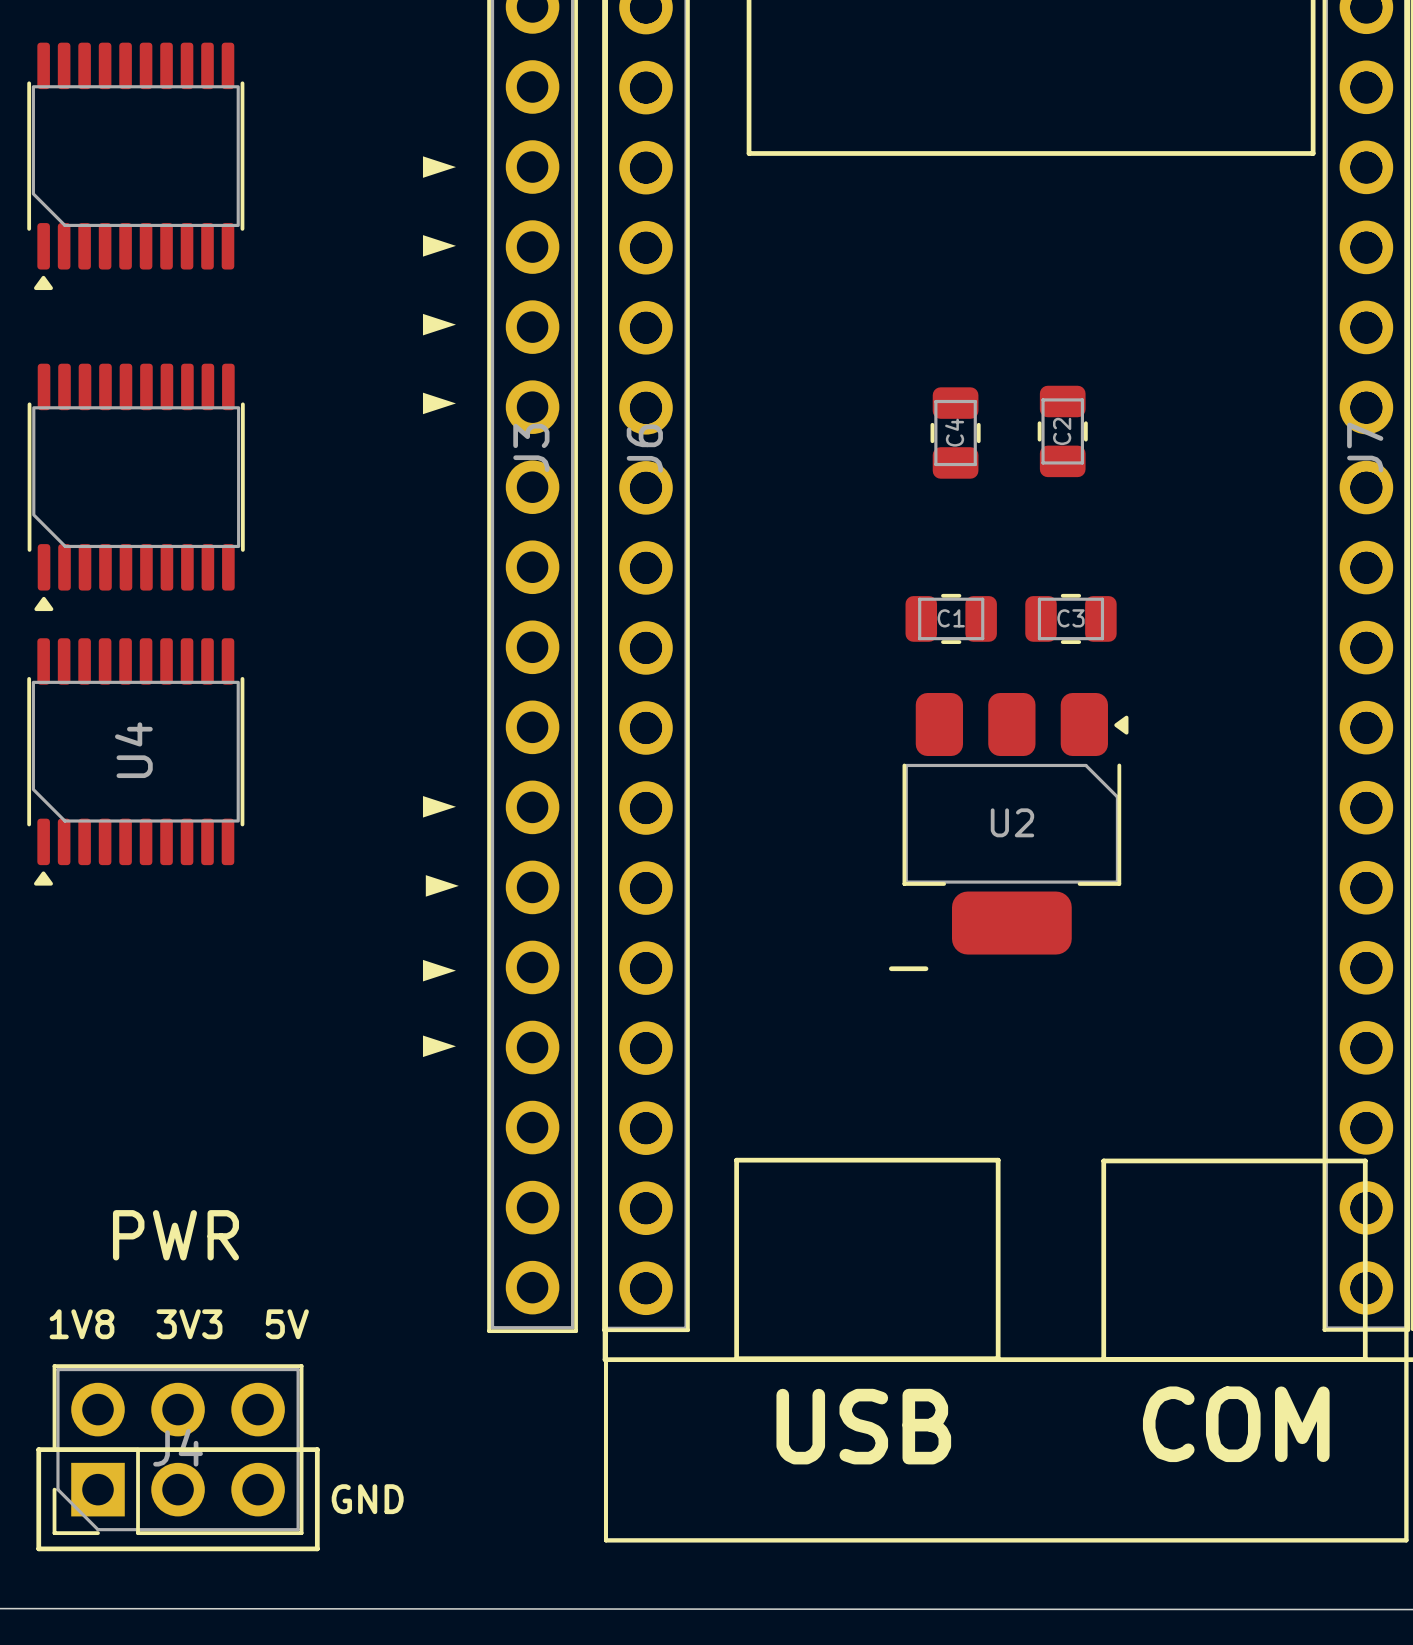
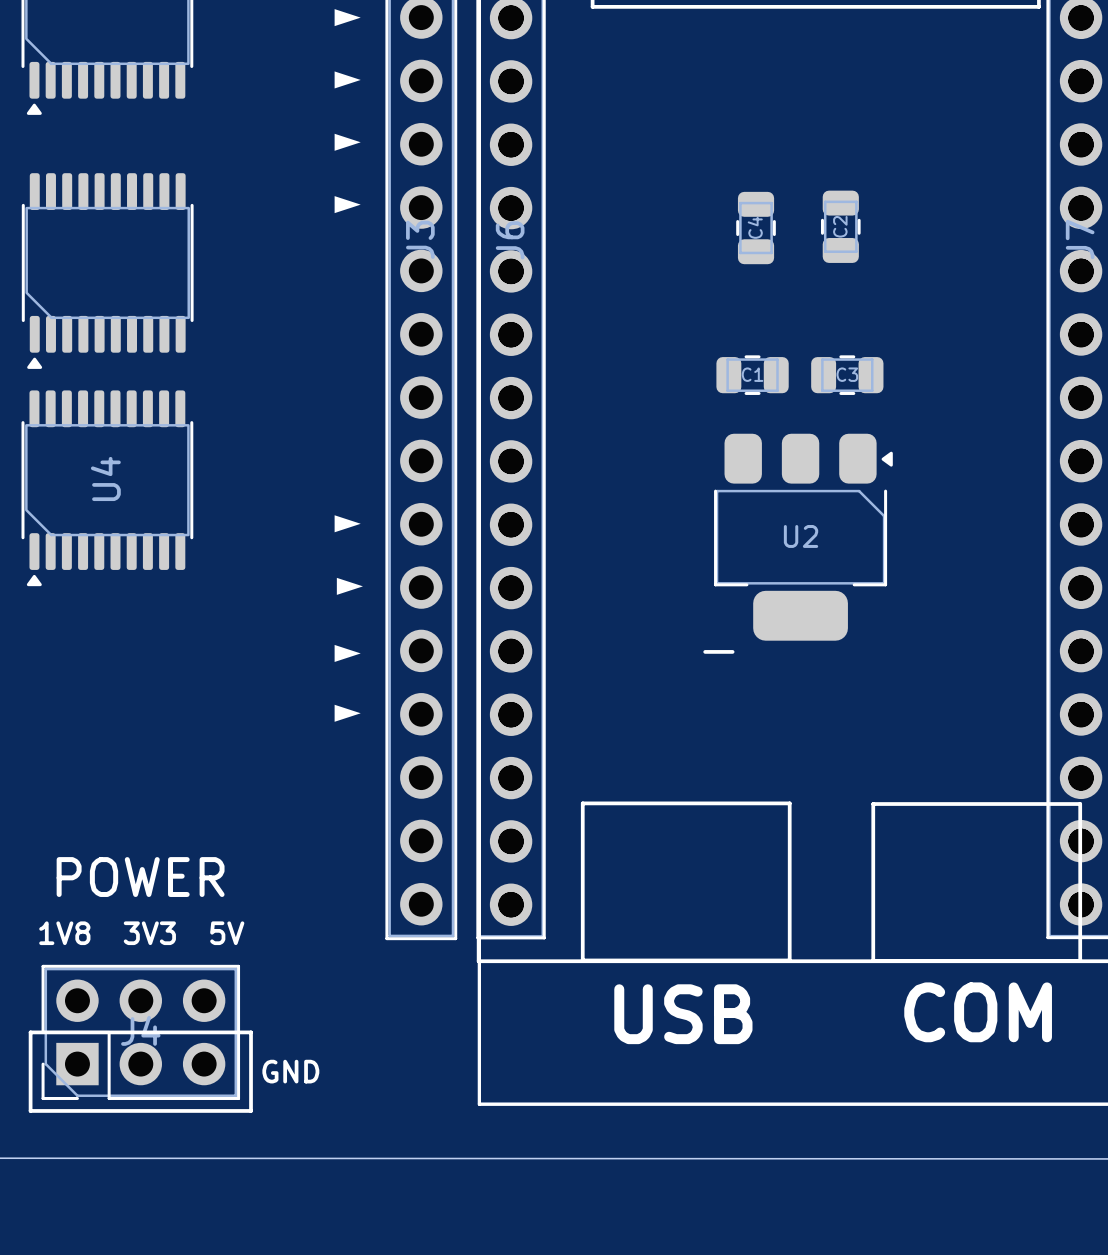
text: PWR (175, 1235) -> POWER (140, 877)

